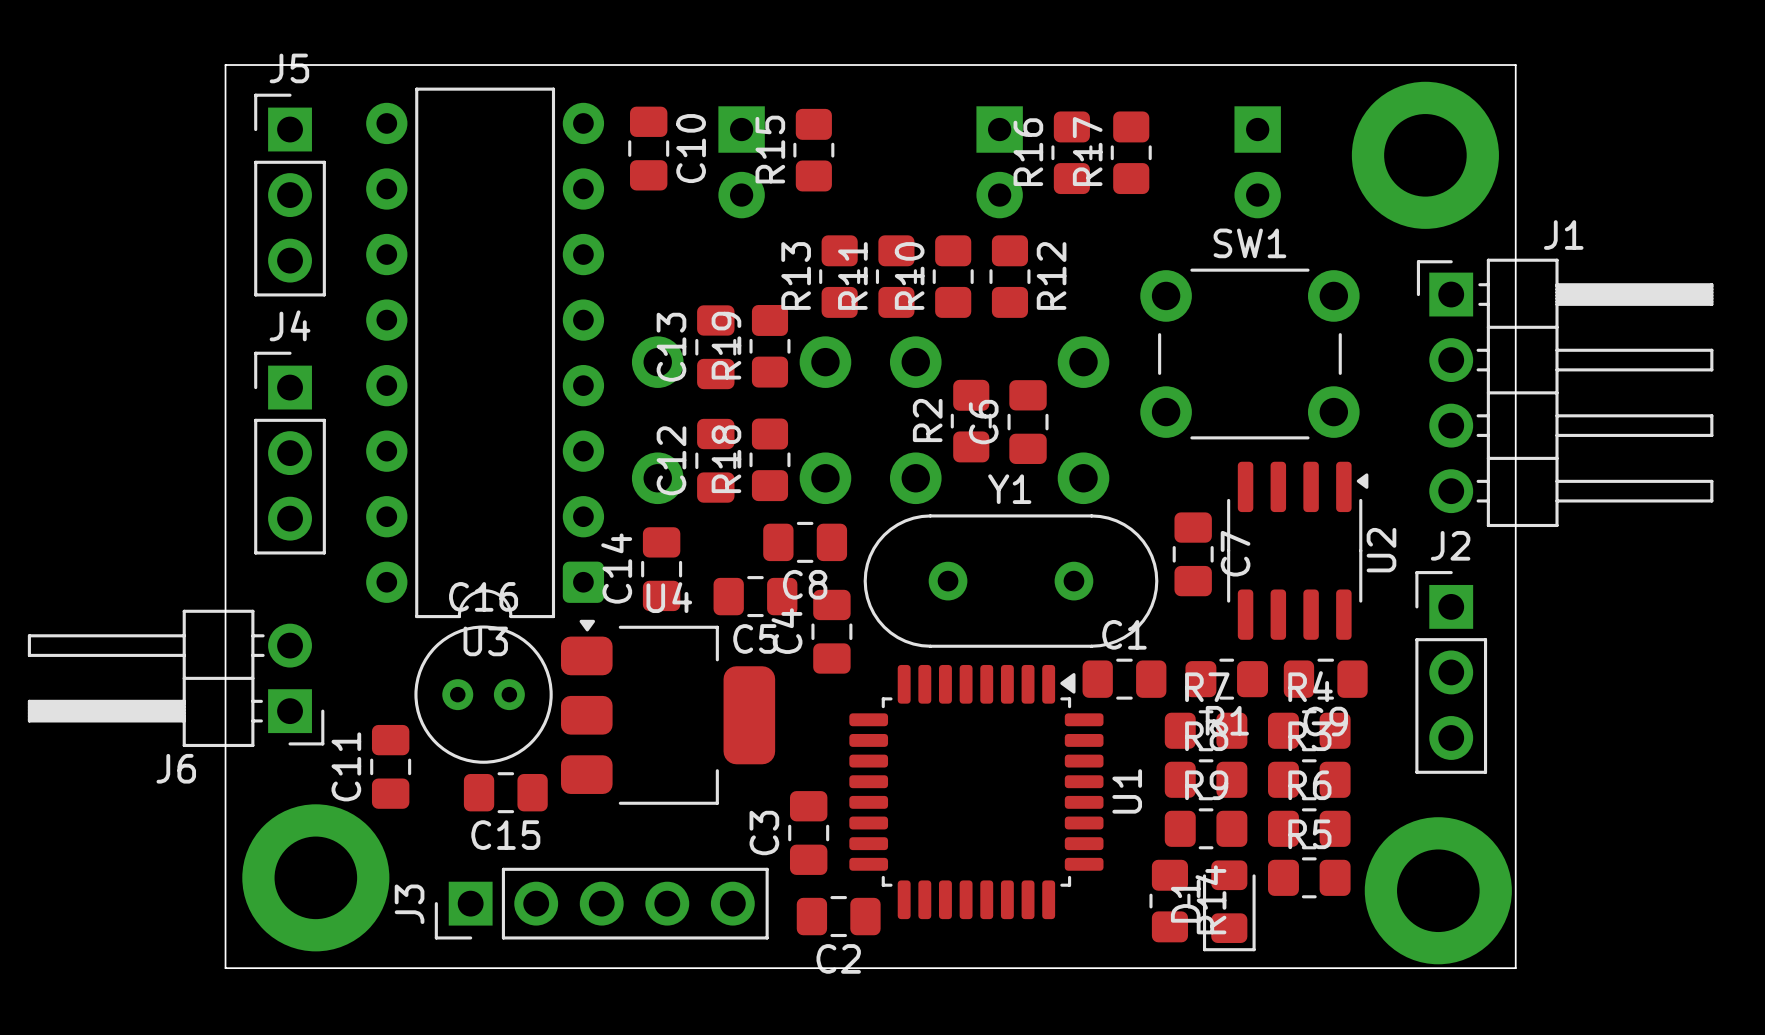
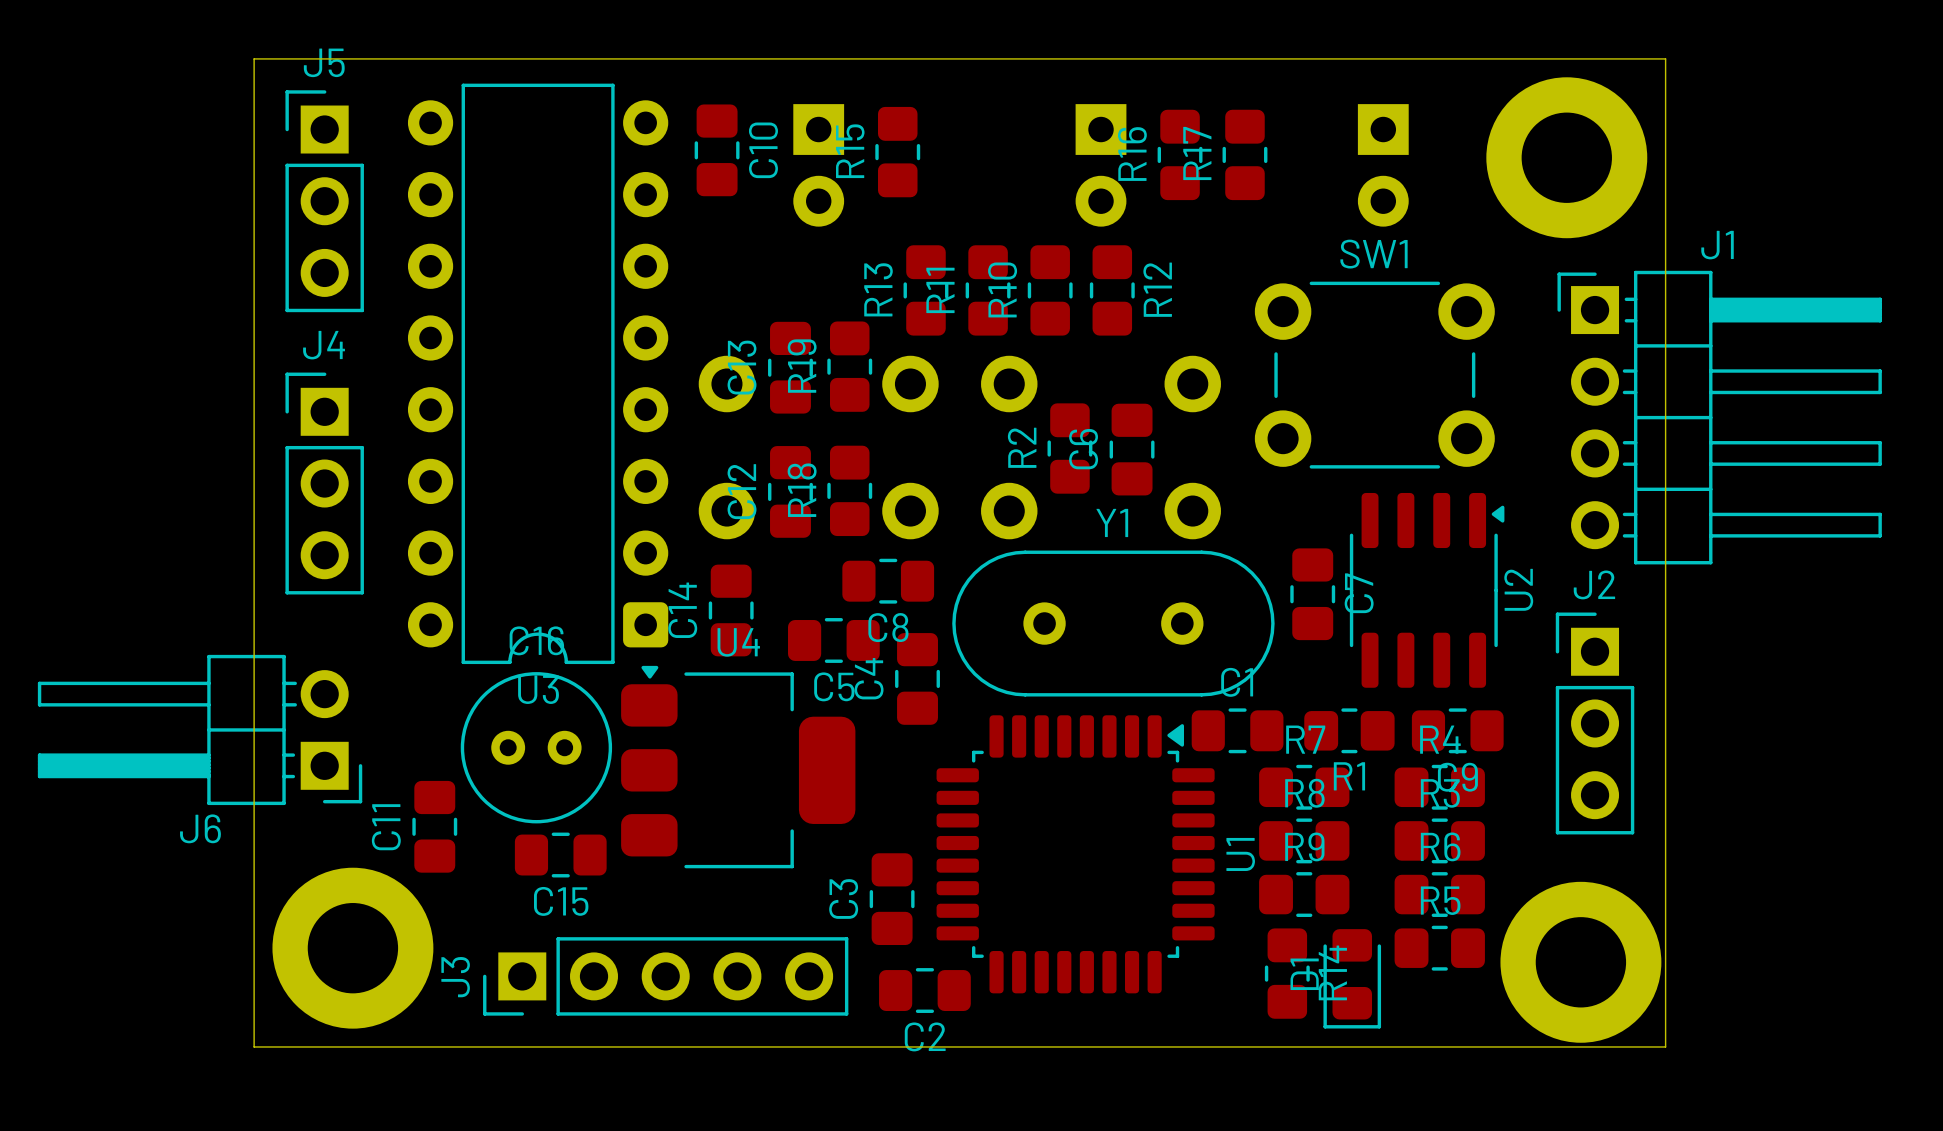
R7 position: (1206, 730) -> (1304, 787)
R8 position: (1206, 779) -> (1304, 840)
R9 position: (1206, 828) -> (1304, 894)

